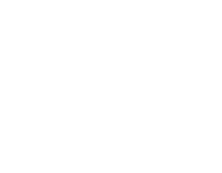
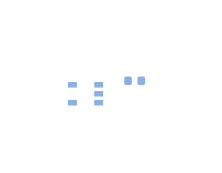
part: none -> (134, 80)
part: none -> (85, 93)

